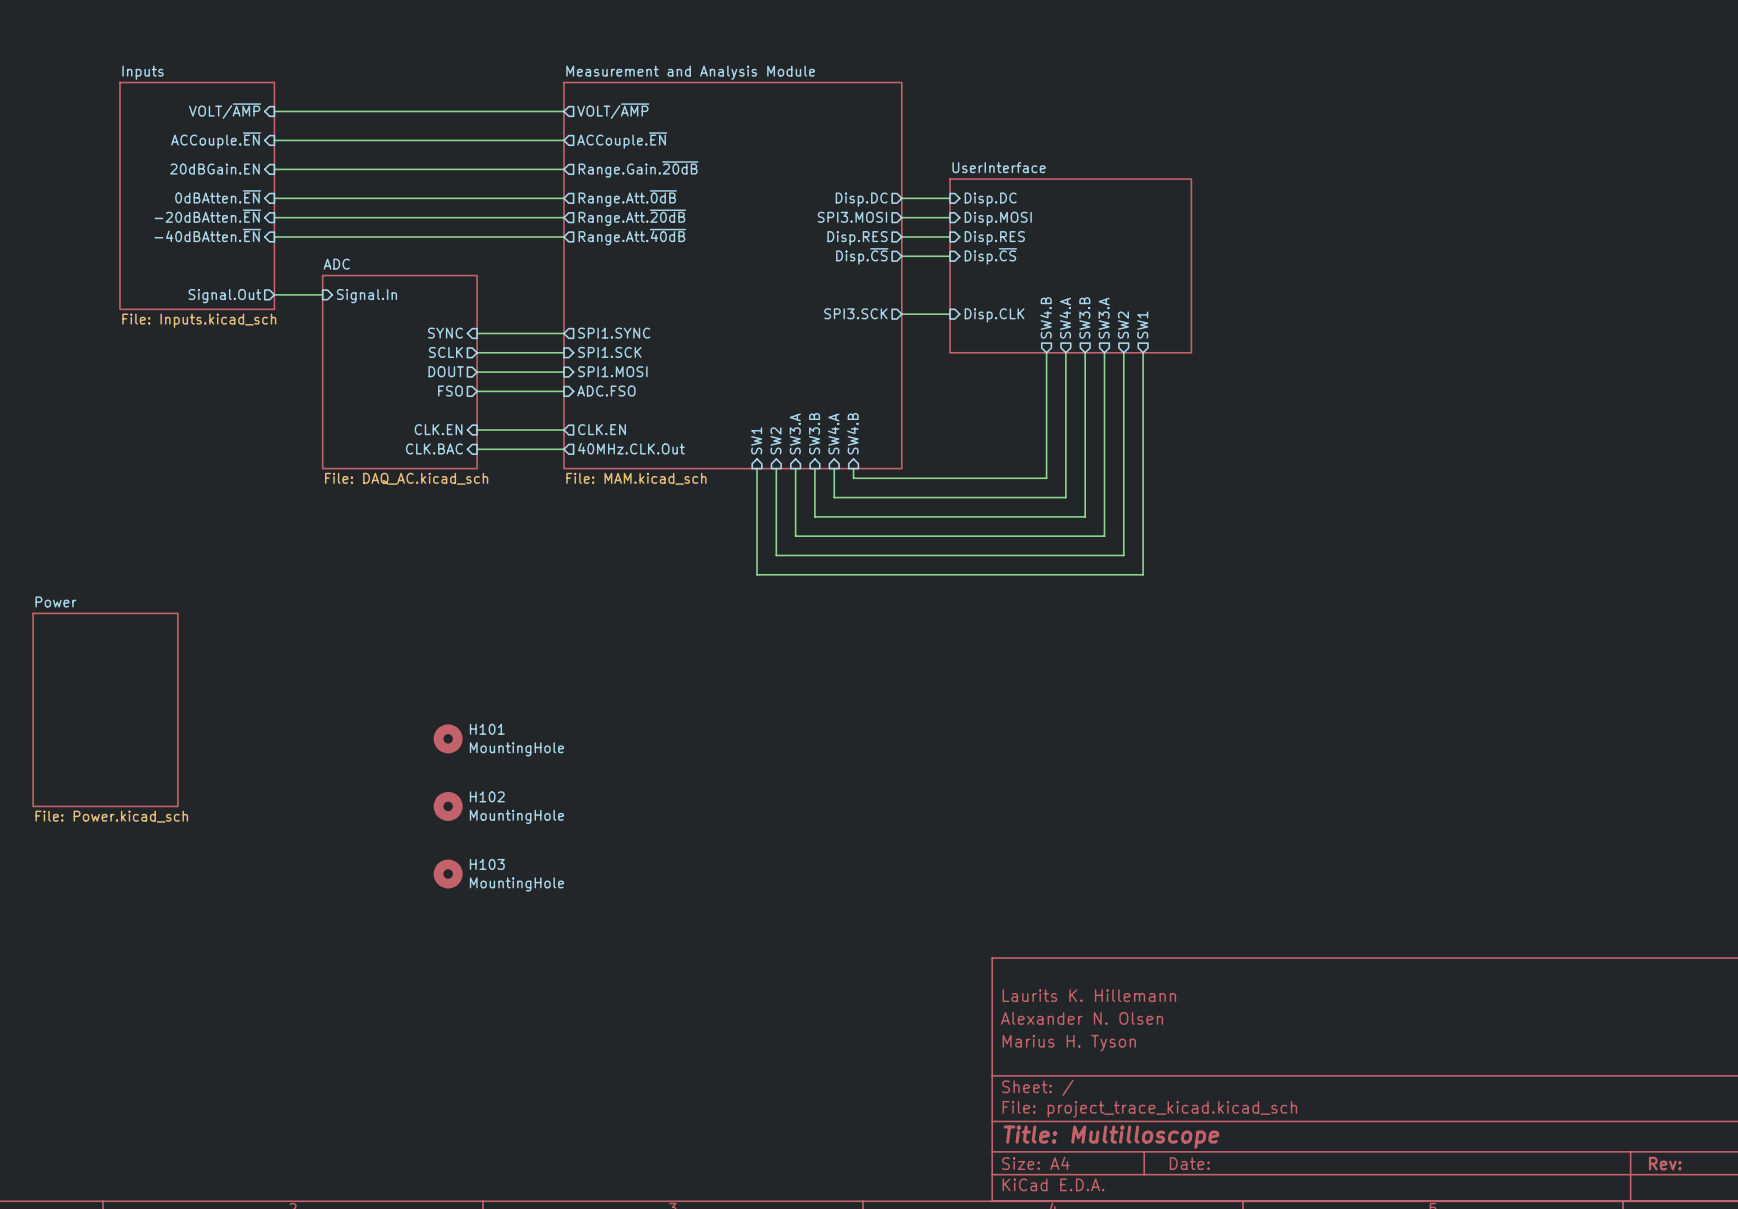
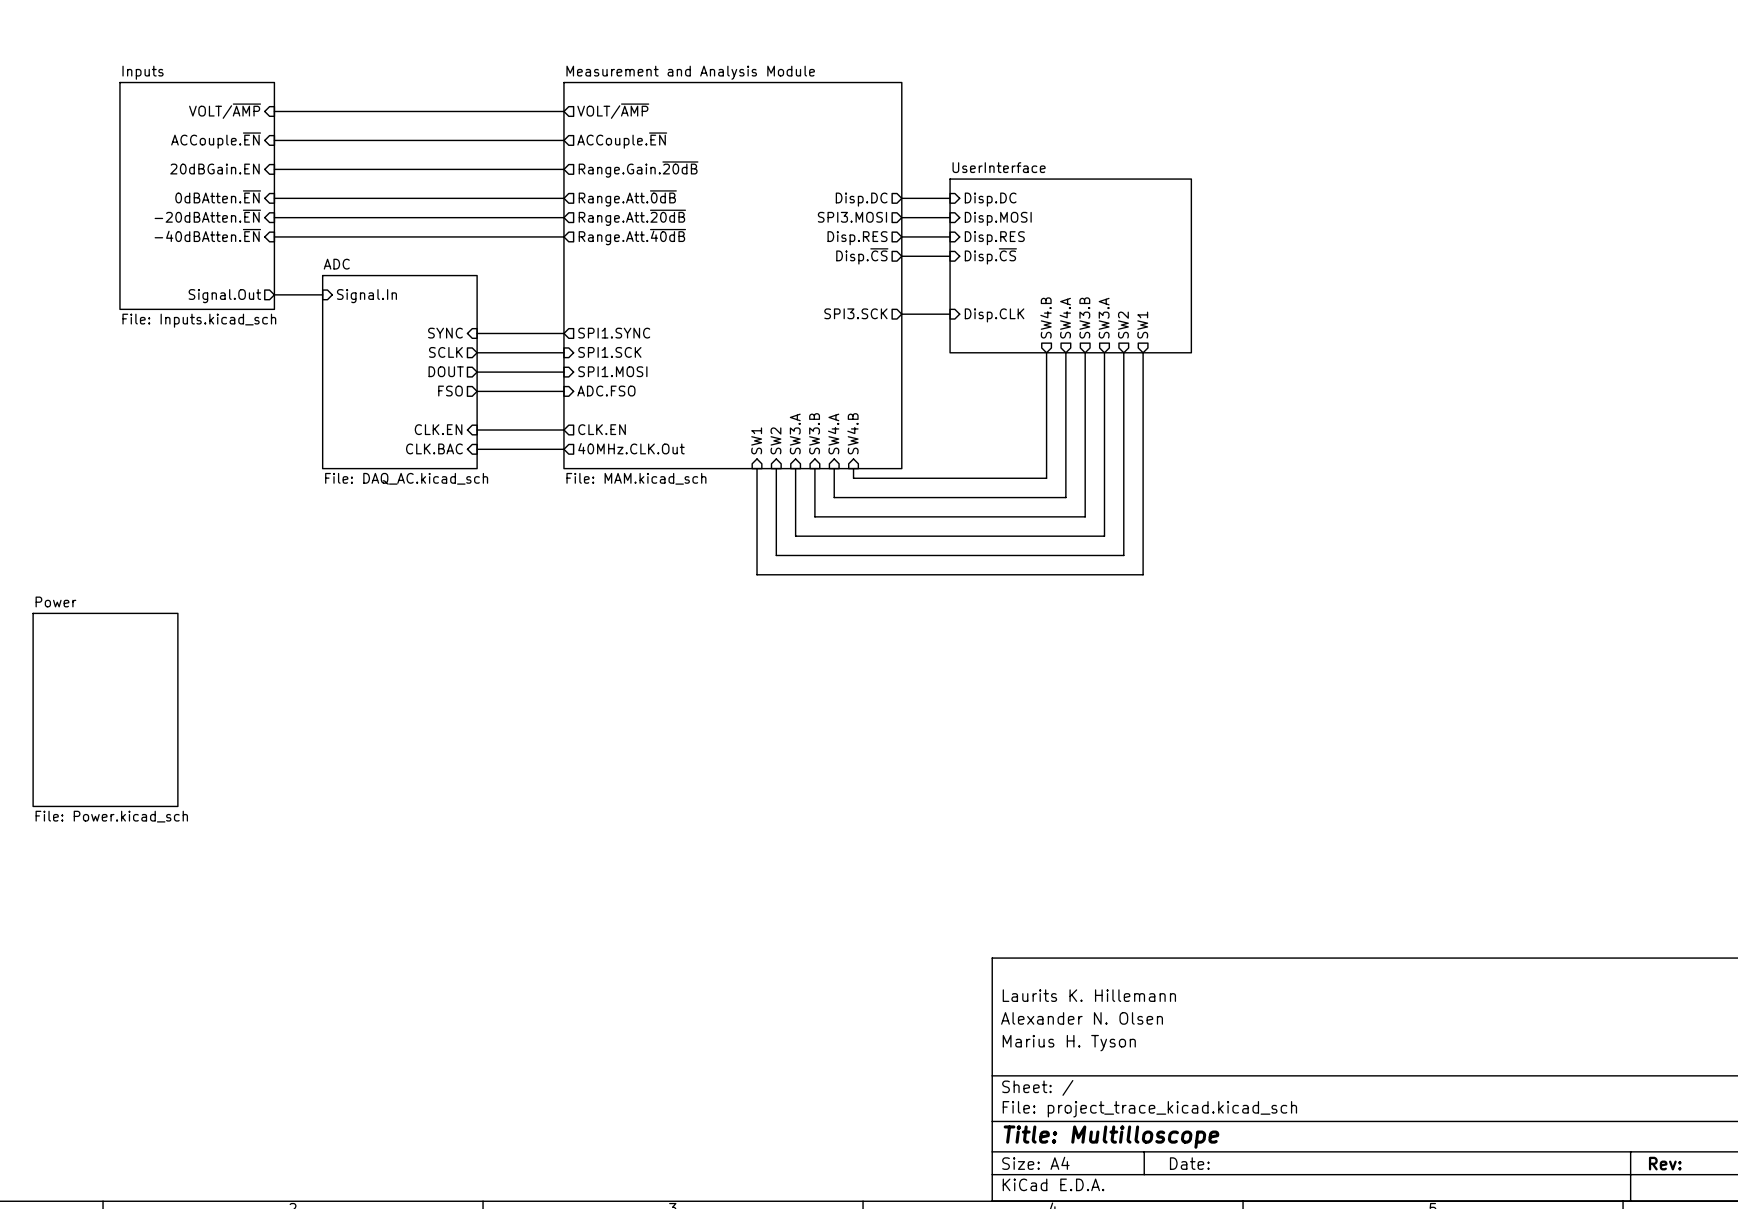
H101: MountingHole (448, 738) -> none
H102: MountingHole (448, 806) -> none
H103: MountingHole (448, 874) -> none

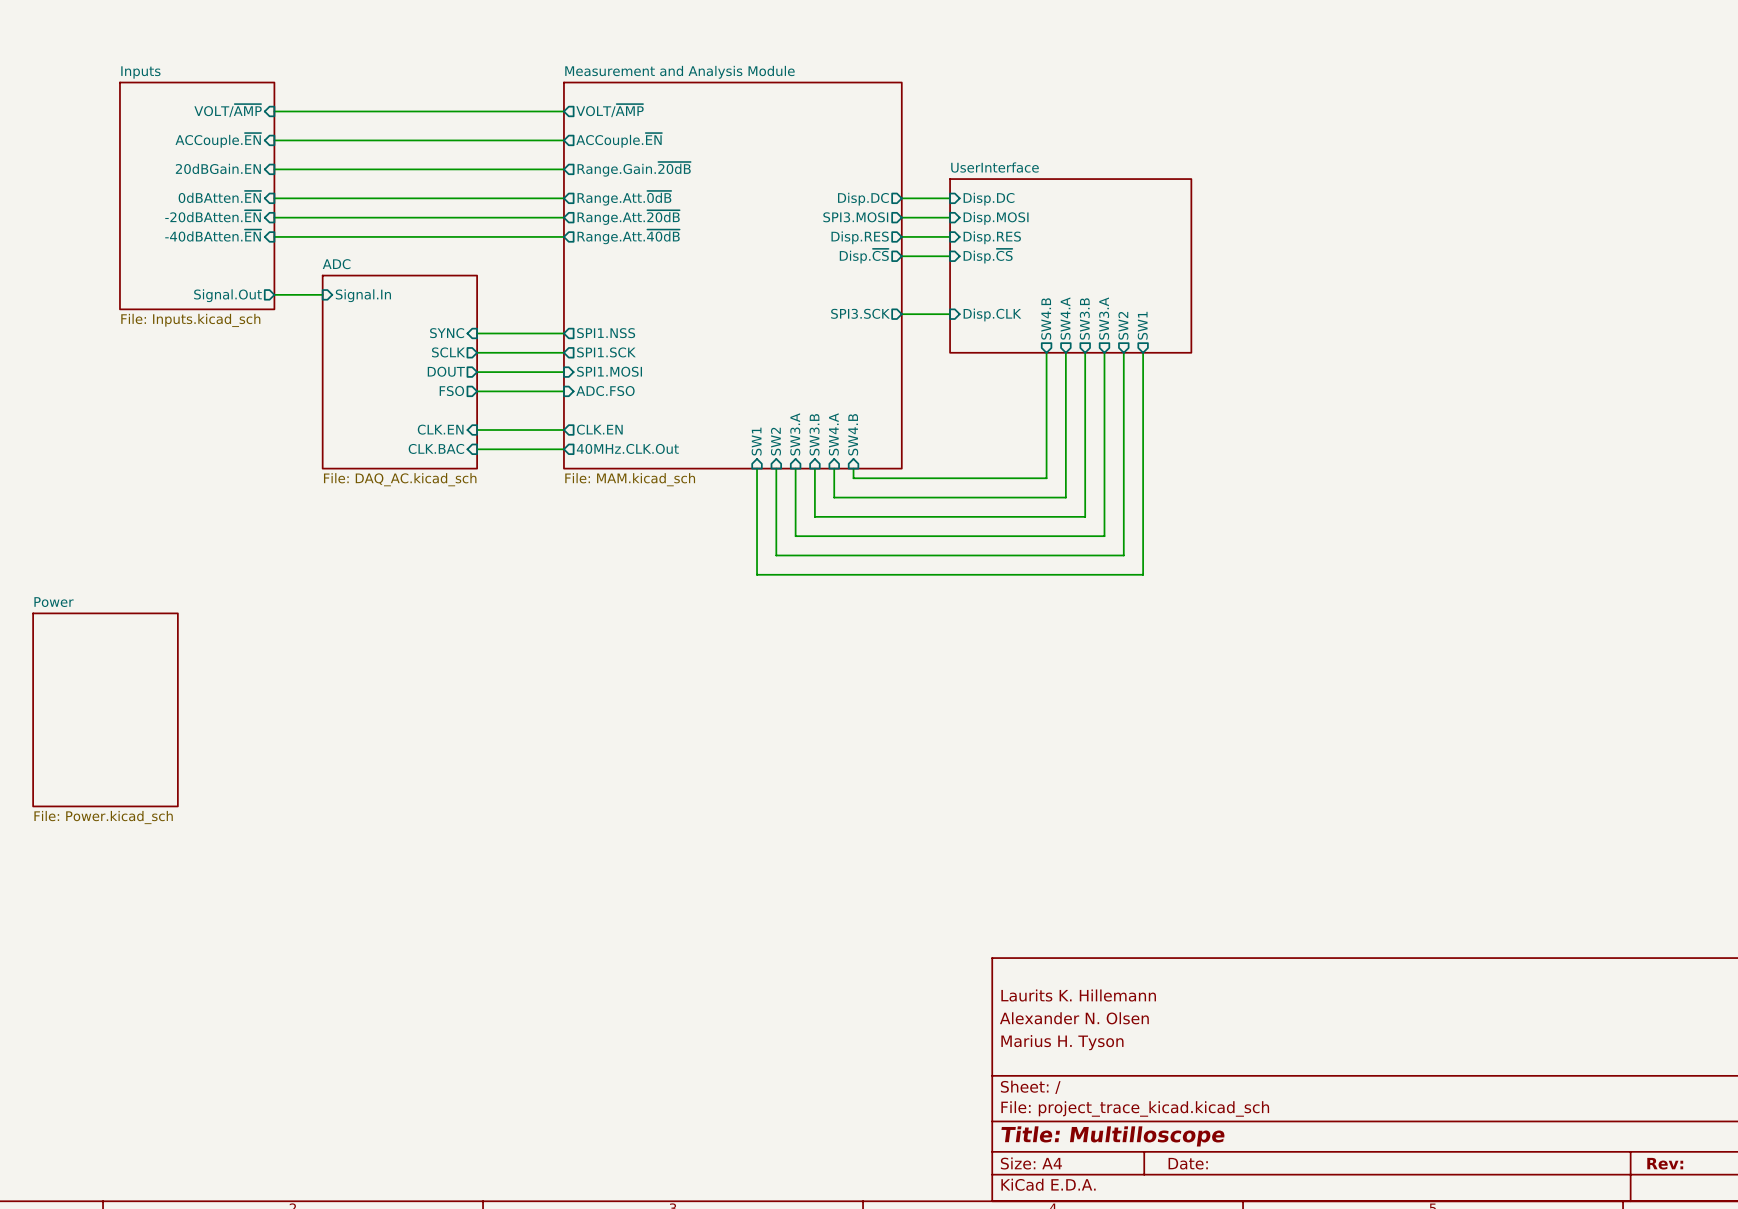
sheet pin: SPI1.SYNC (614, 333) -> SPI1.NSS (606, 333)
sheet pin shape: input (609, 352) -> output (606, 352)

